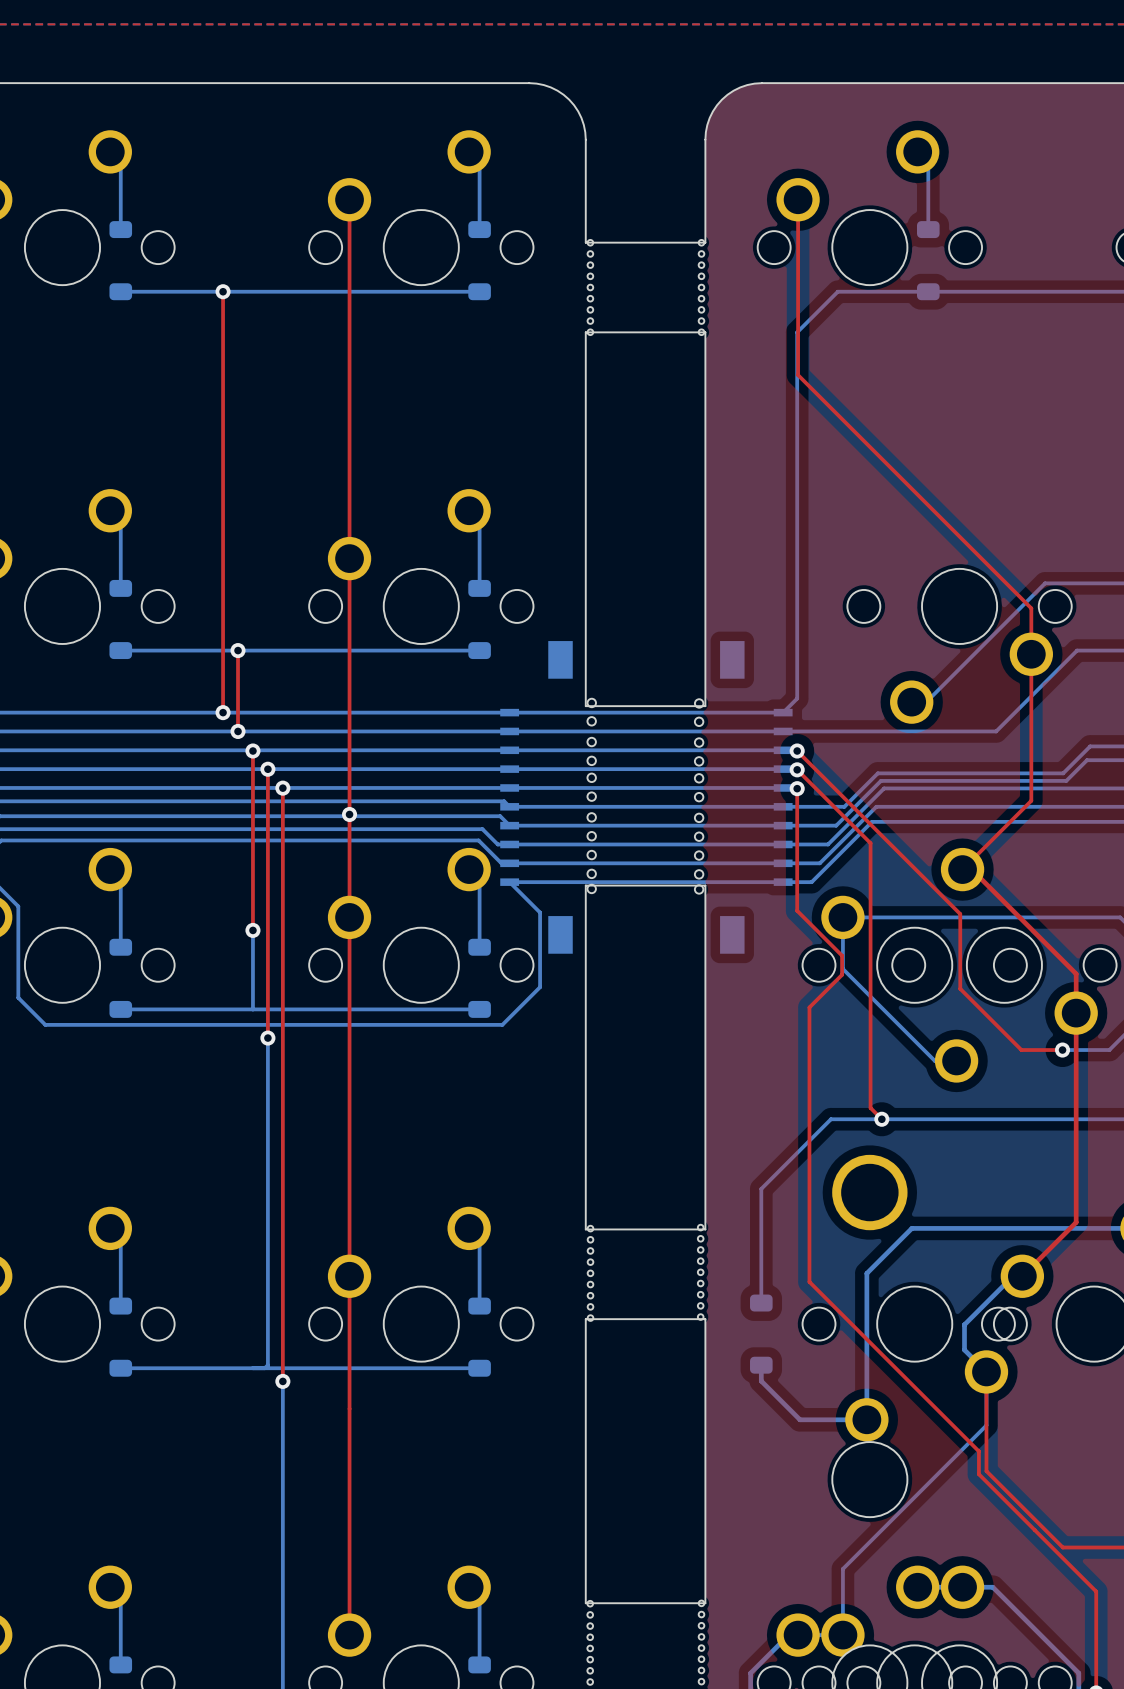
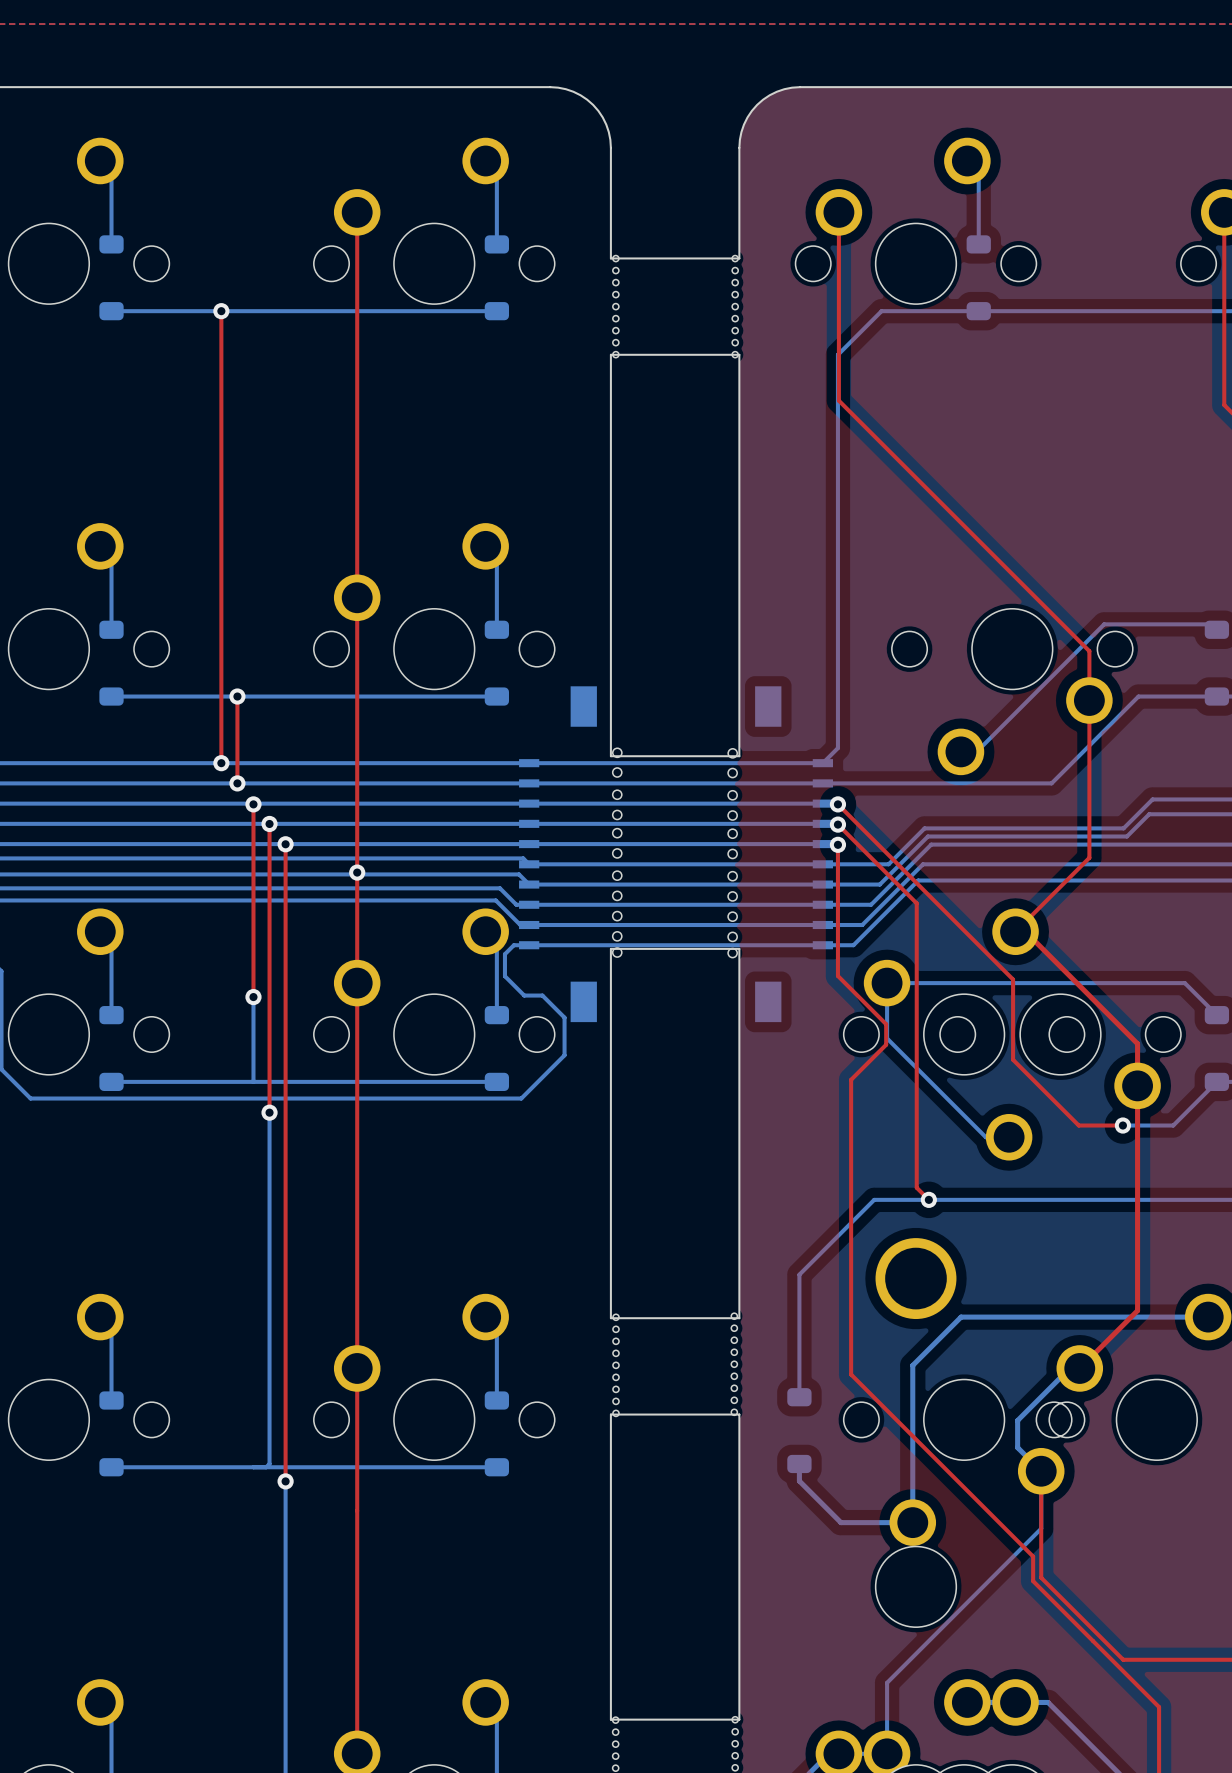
bottom track: (509, 882) (540, 912) (540, 987) -> (529, 945) (513, 945) (504, 954) (504, 976) (524, 995) (542, 995) (564, 1017) (564, 1055) (561, 1058)

